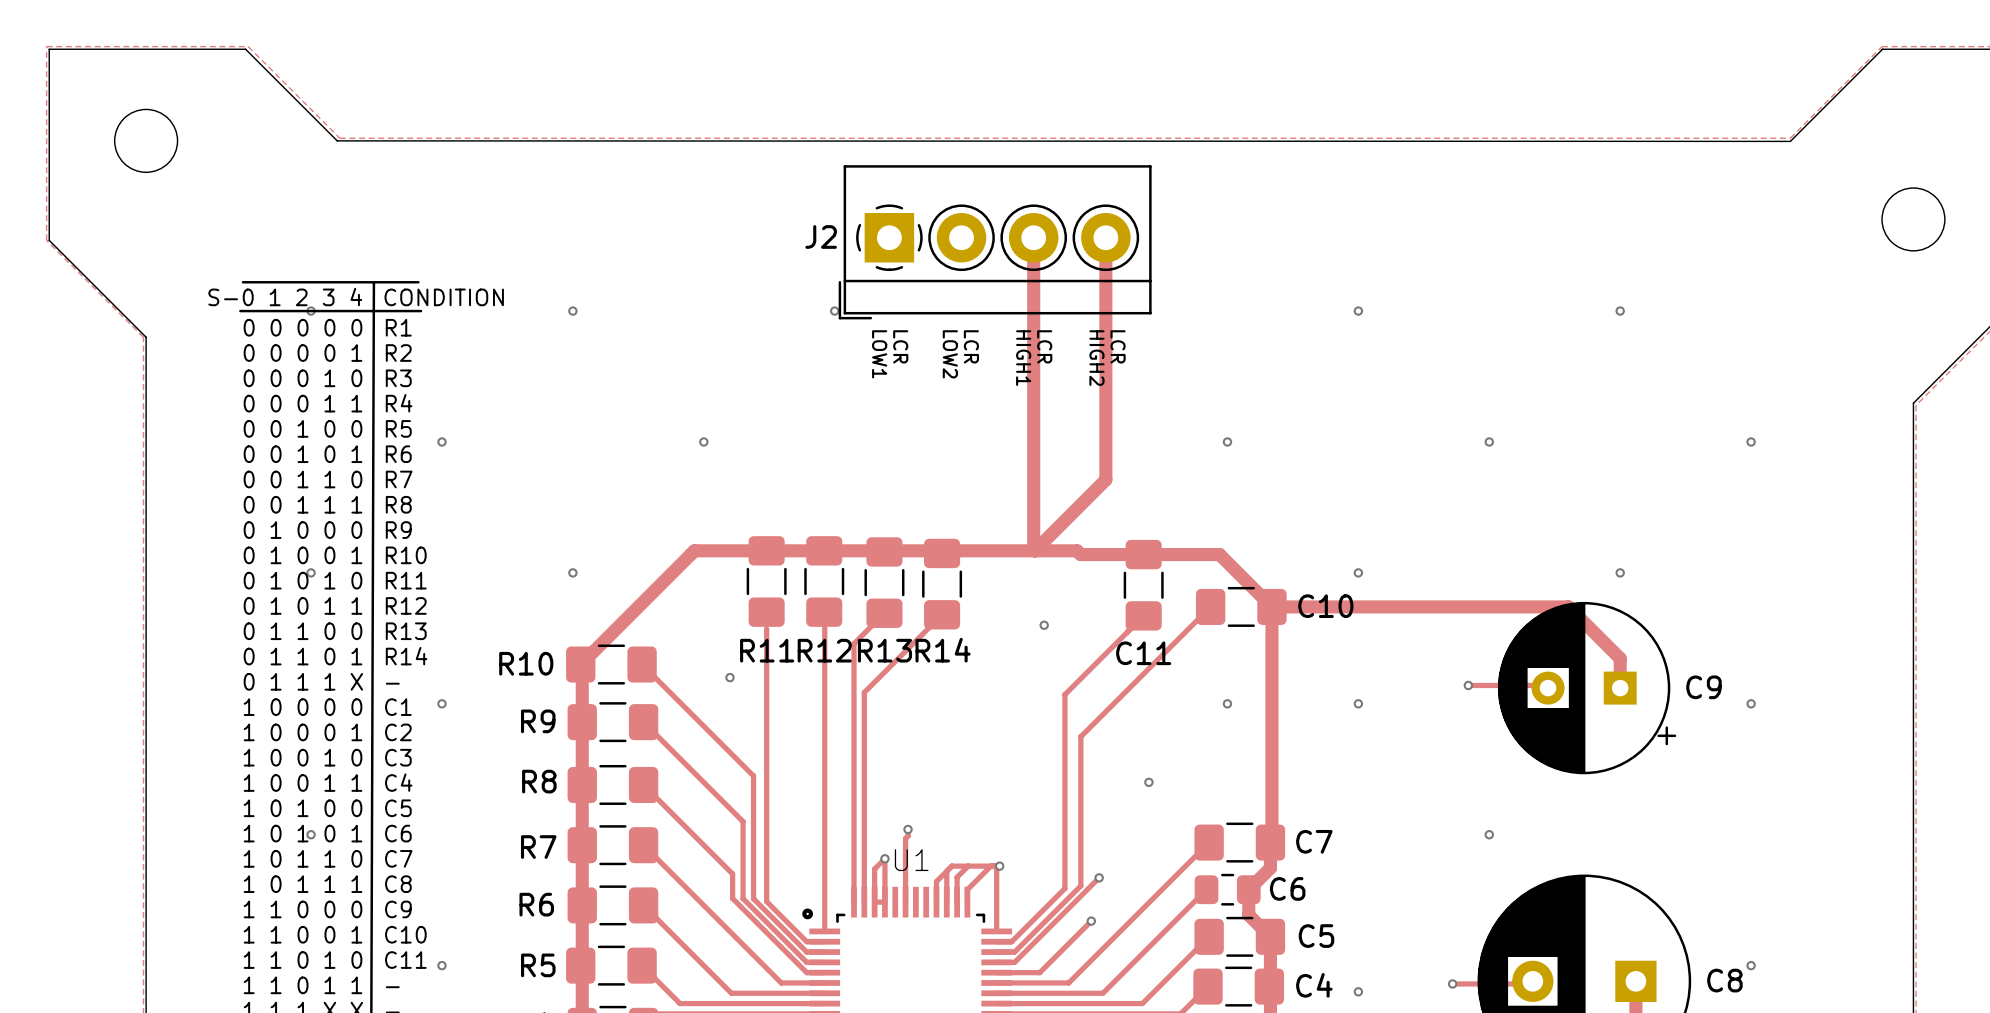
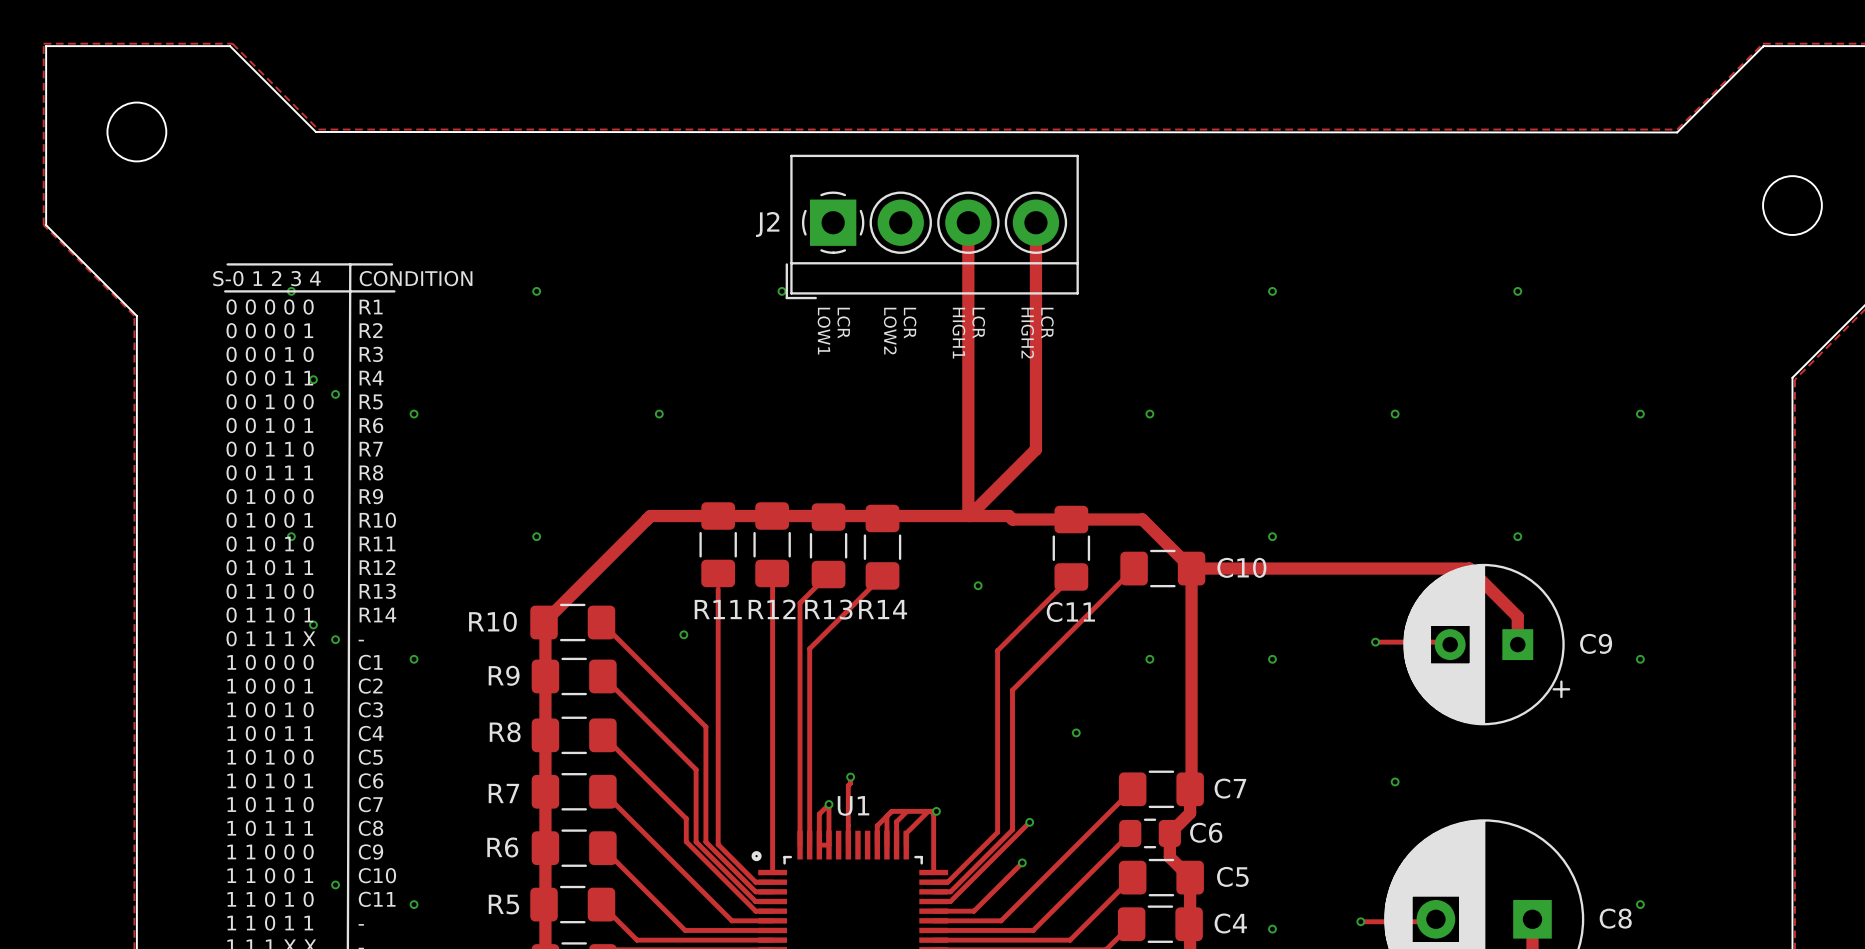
via: none -> (313, 379)
via: none -> (335, 394)
via: none -> (313, 624)
via: none -> (335, 639)
via: (311, 834) -> none
via: none -> (335, 884)

